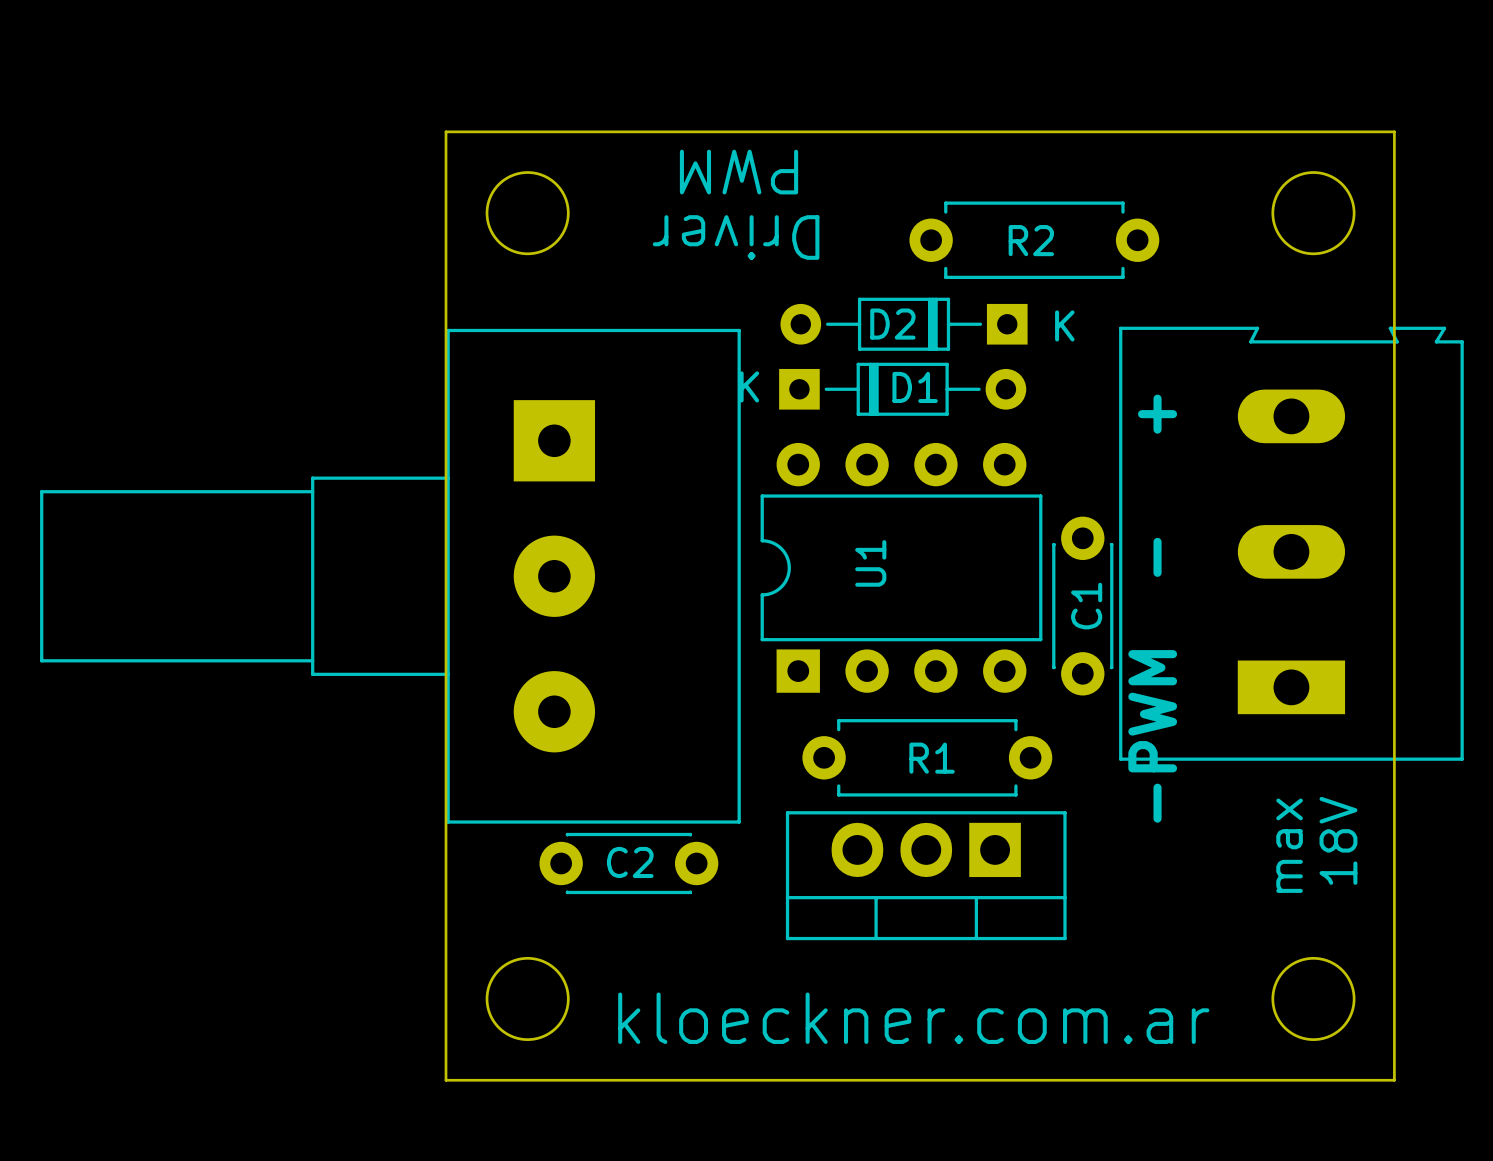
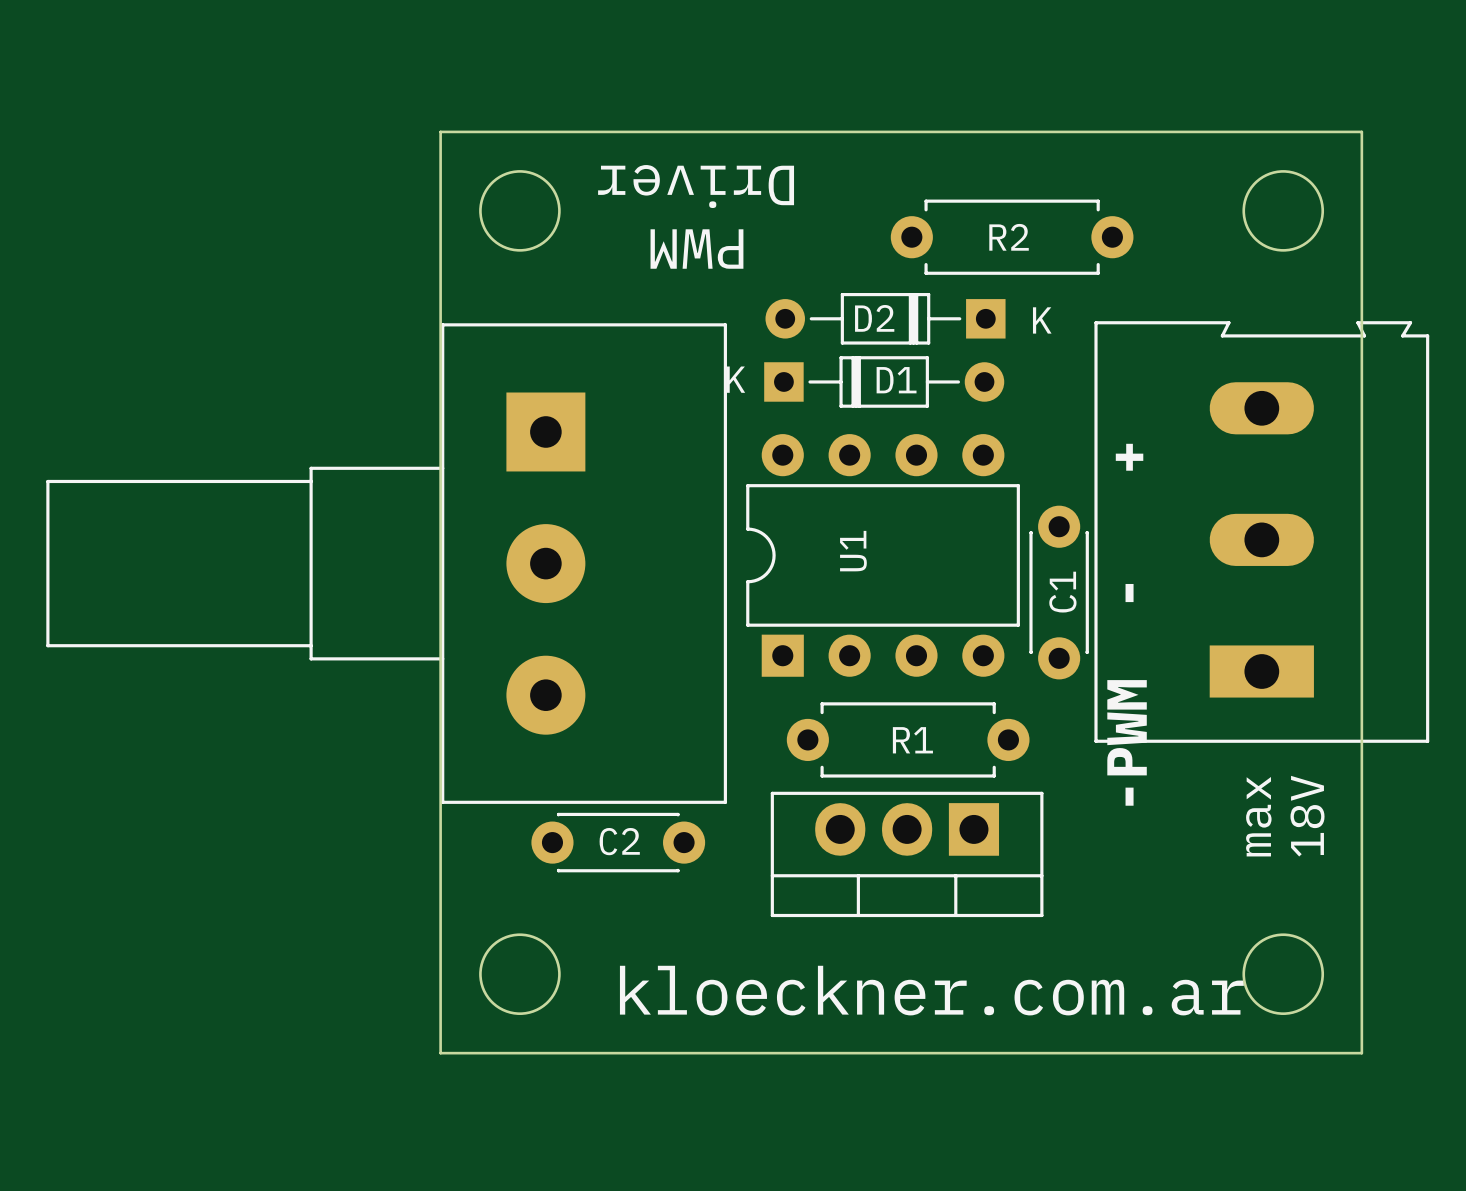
text position: PWM (739, 172) -> PWM (696, 249)
text position: Driver (736, 237) -> Driver (696, 186)
text position: kloeckner.com.ar (913, 1018) -> kloeckner.com.ar (931, 990)

